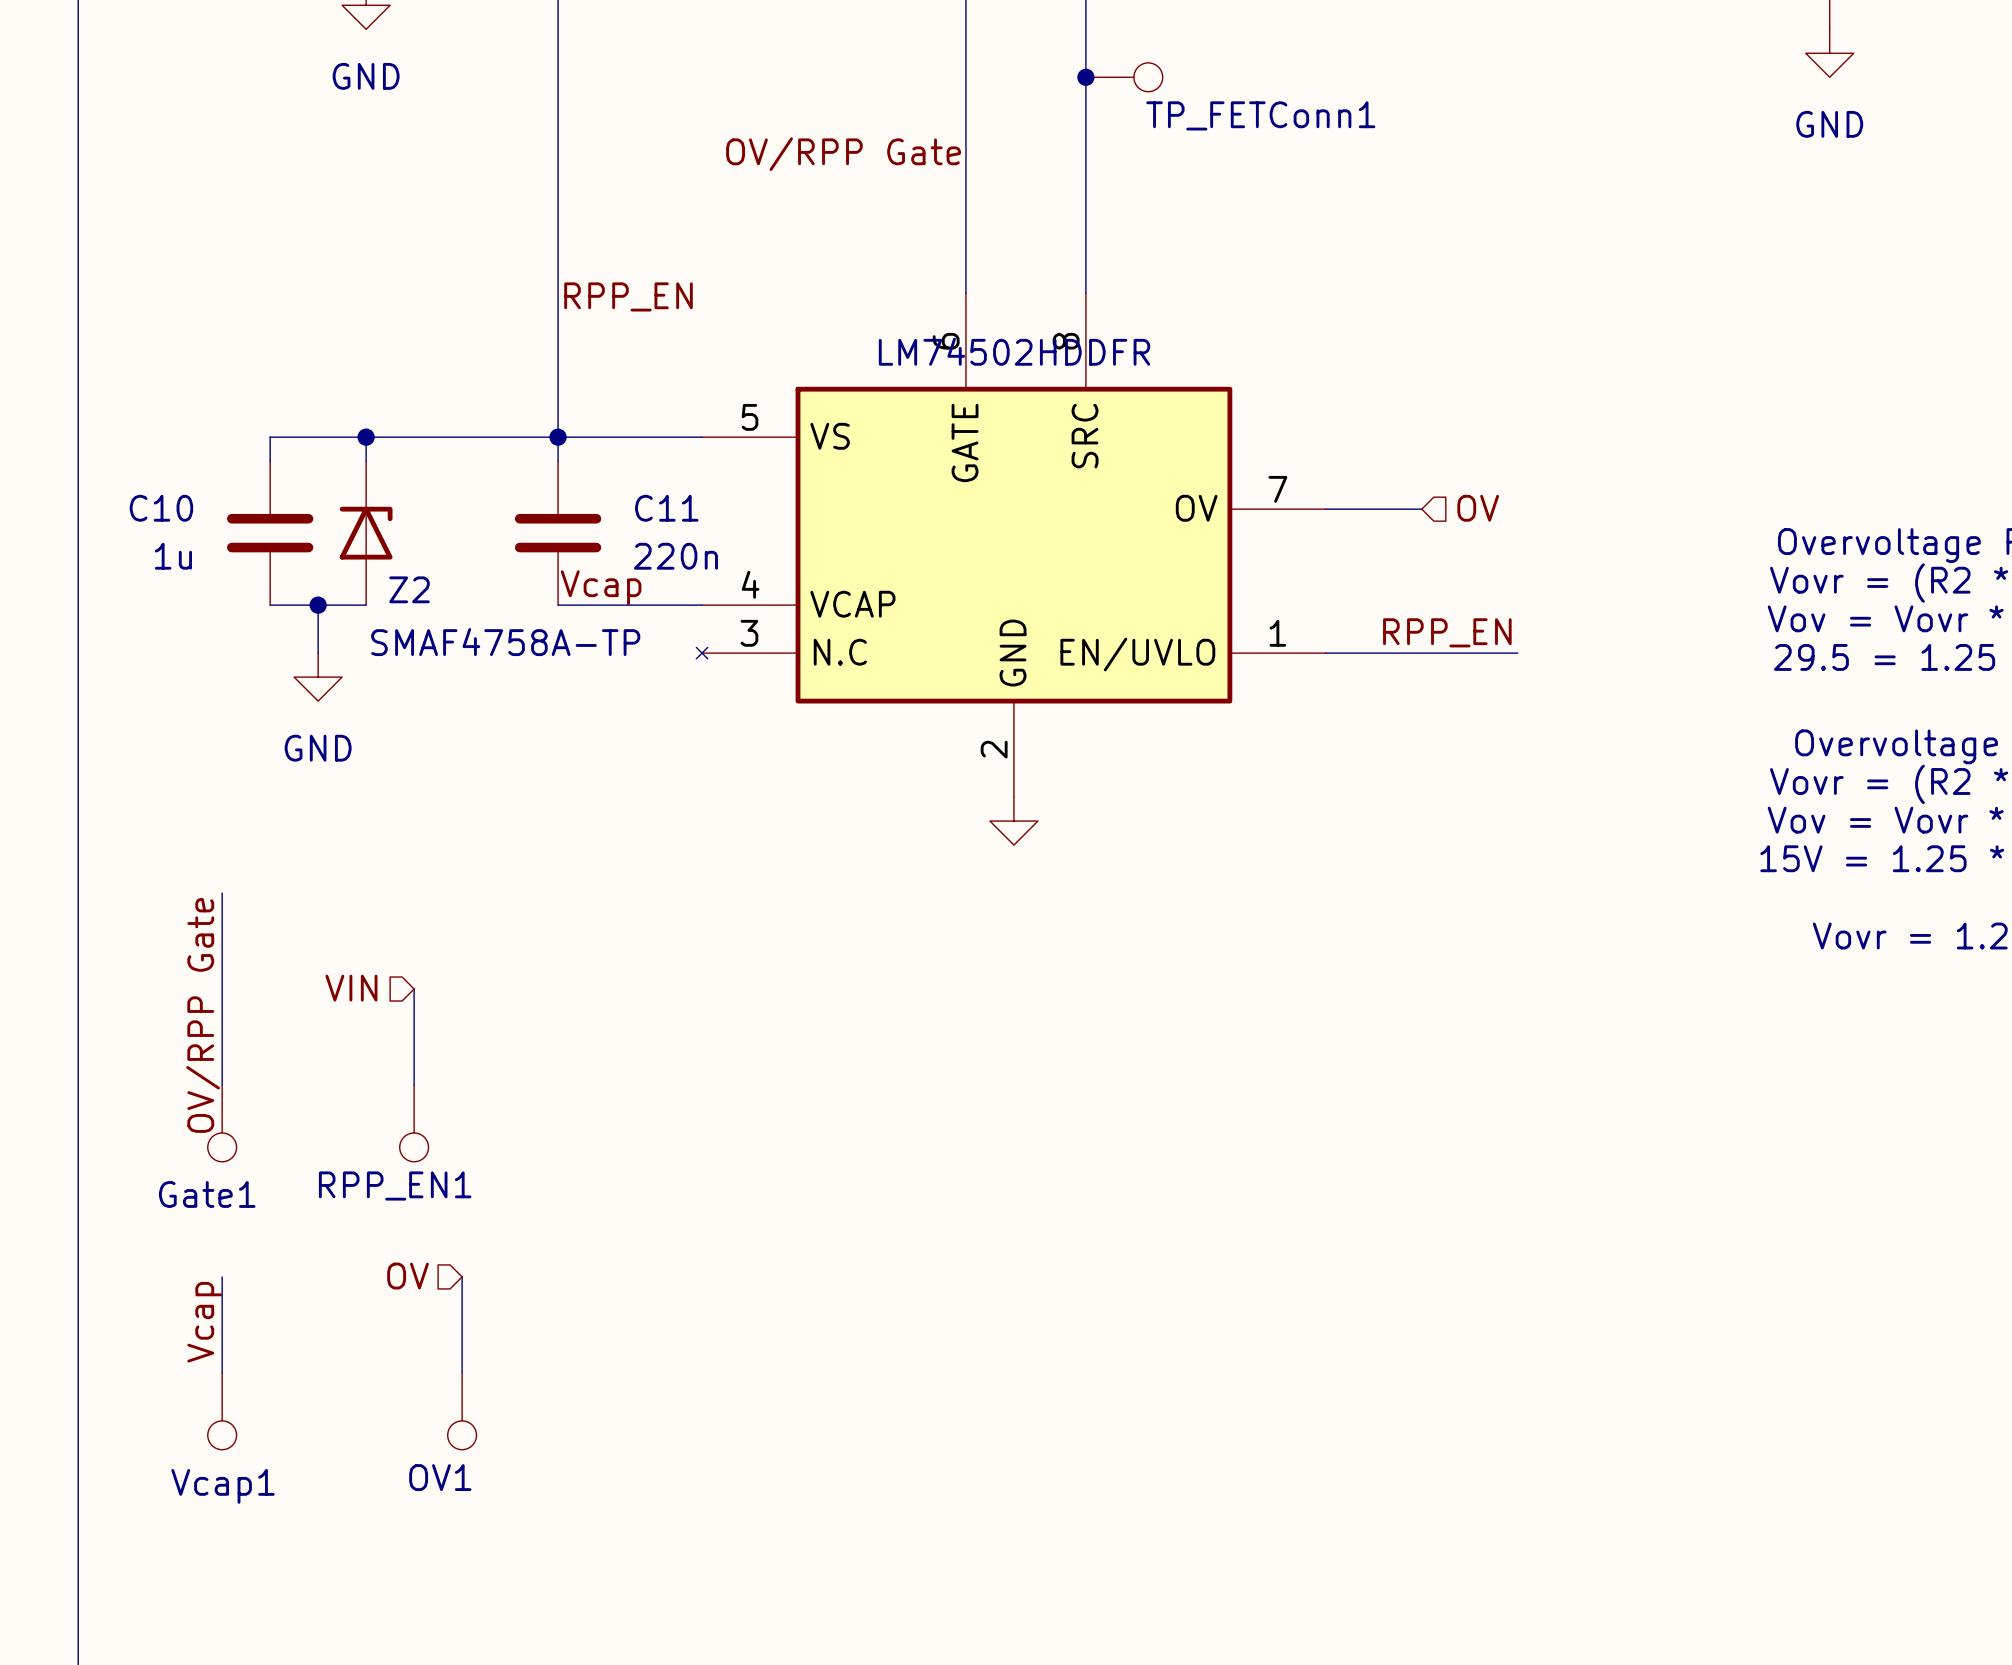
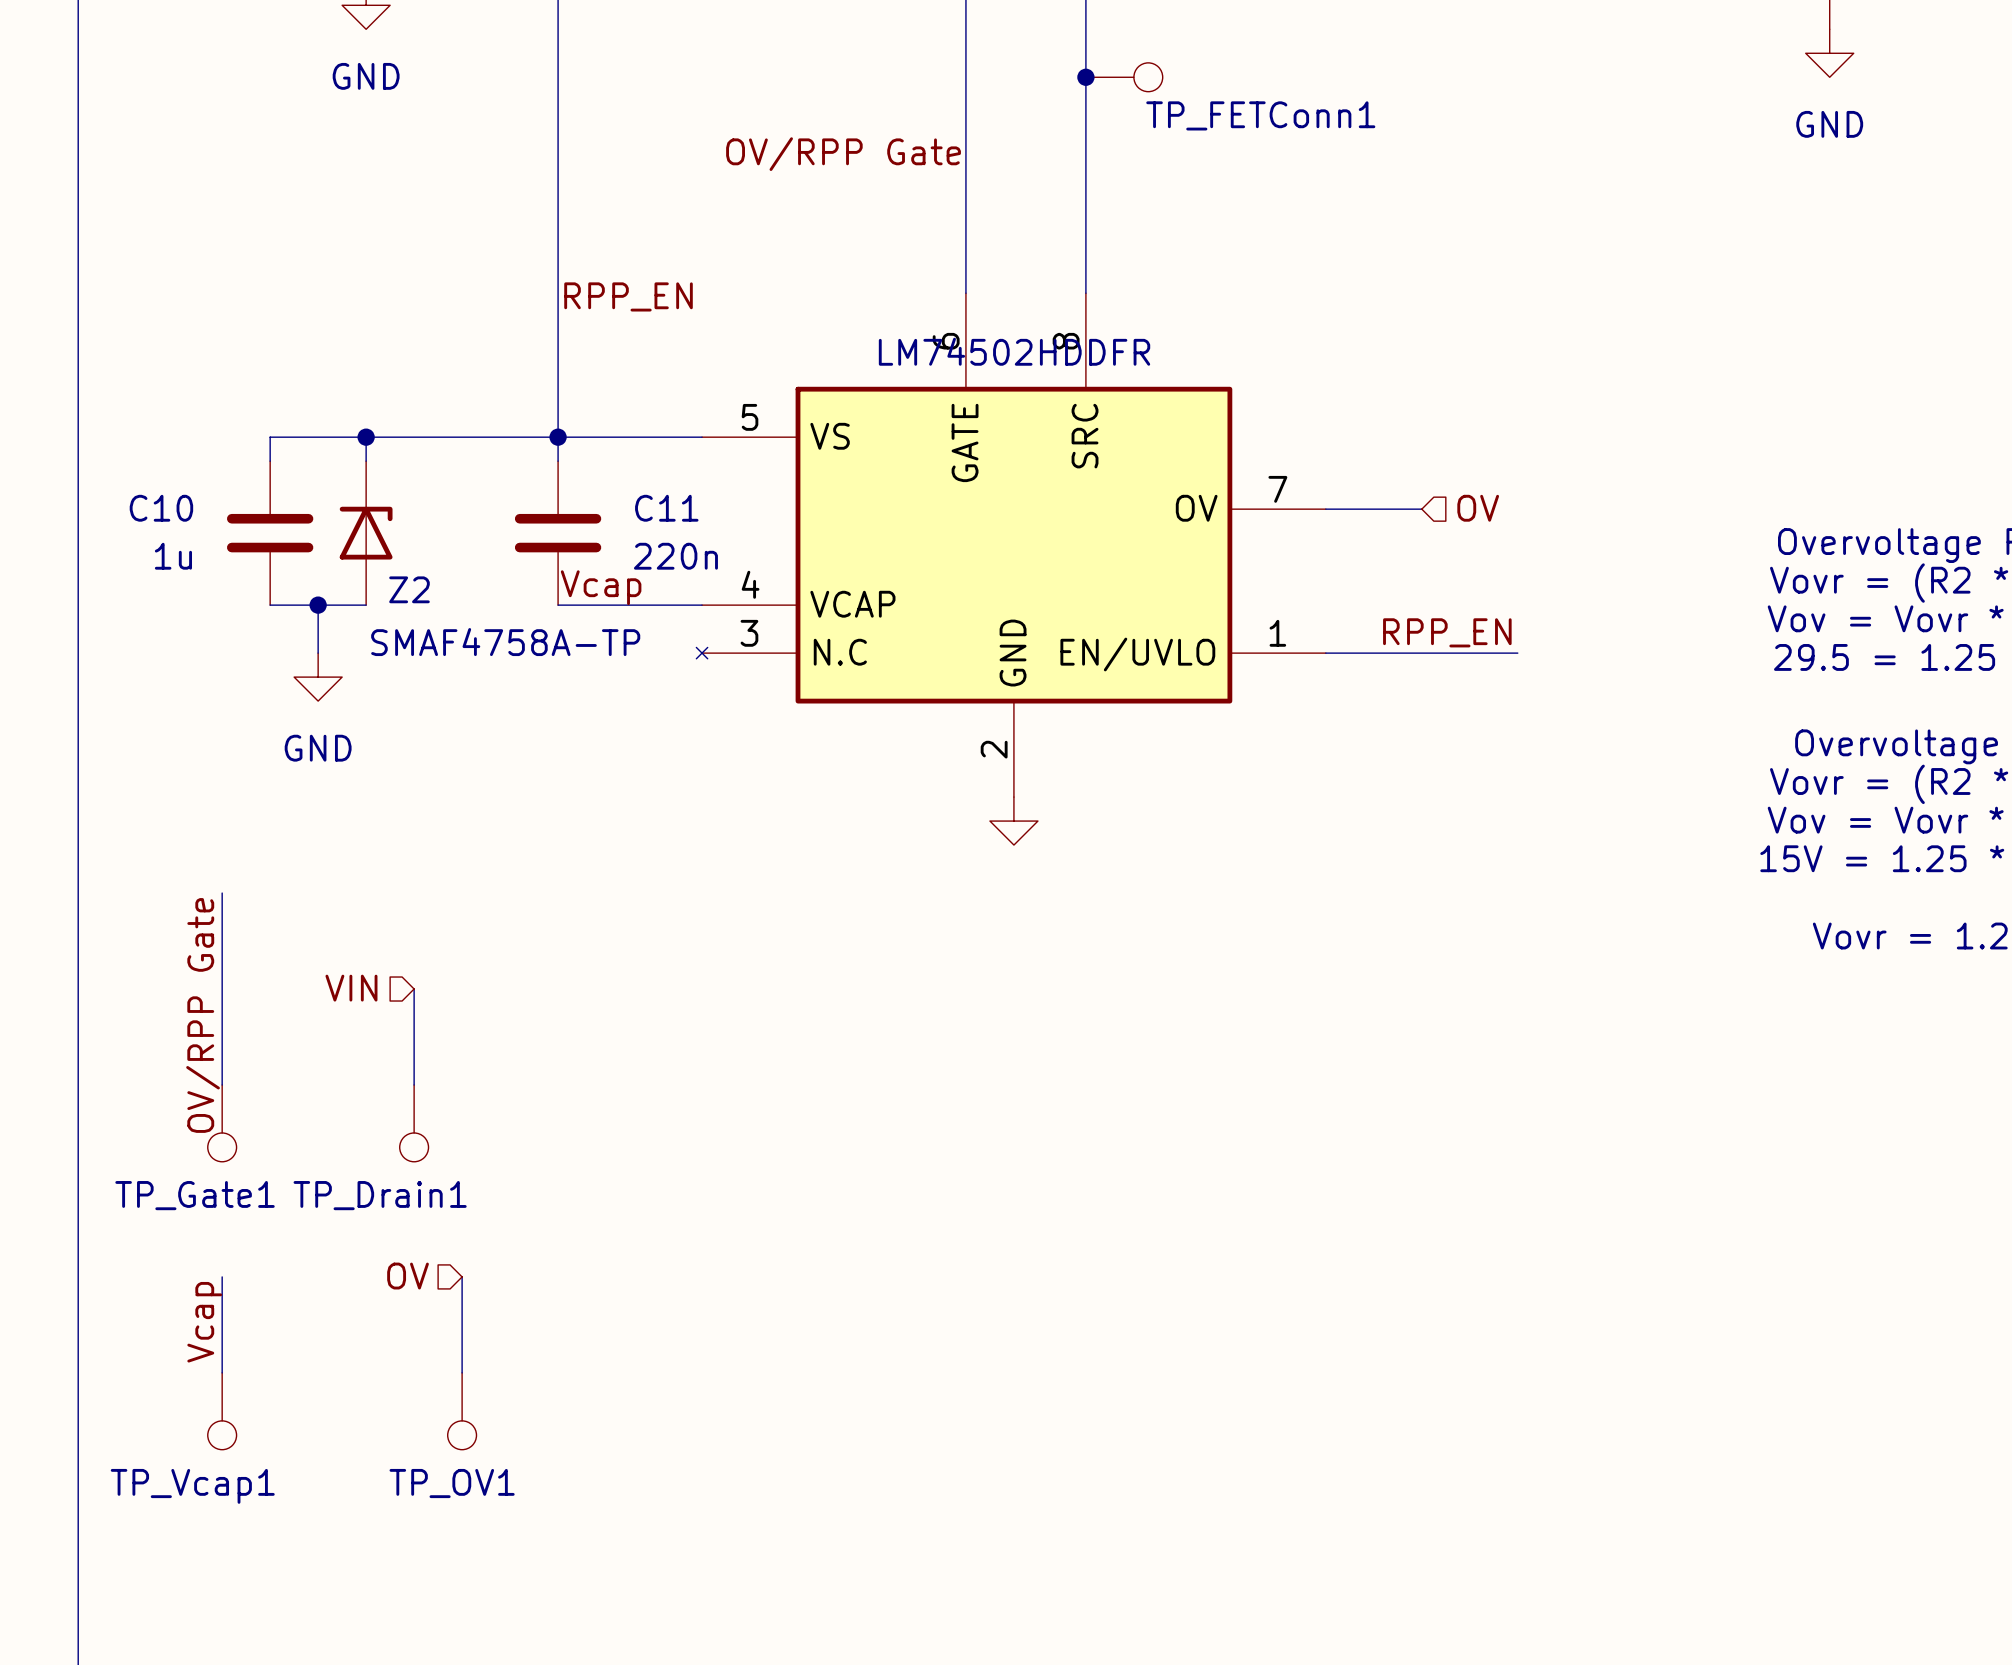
RPP_EN1 name: RPP_EN1 (395, 1186) -> TP_Drain1 (380, 1195)
Gate1 name: Gate1 (207, 1194) -> TP_Gate1 (195, 1195)
OV1 name: OV1 (440, 1477) -> TP_OV1 (452, 1483)
Vcap1 name: Vcap1 (223, 1486) -> TP_Vcap1 (192, 1486)

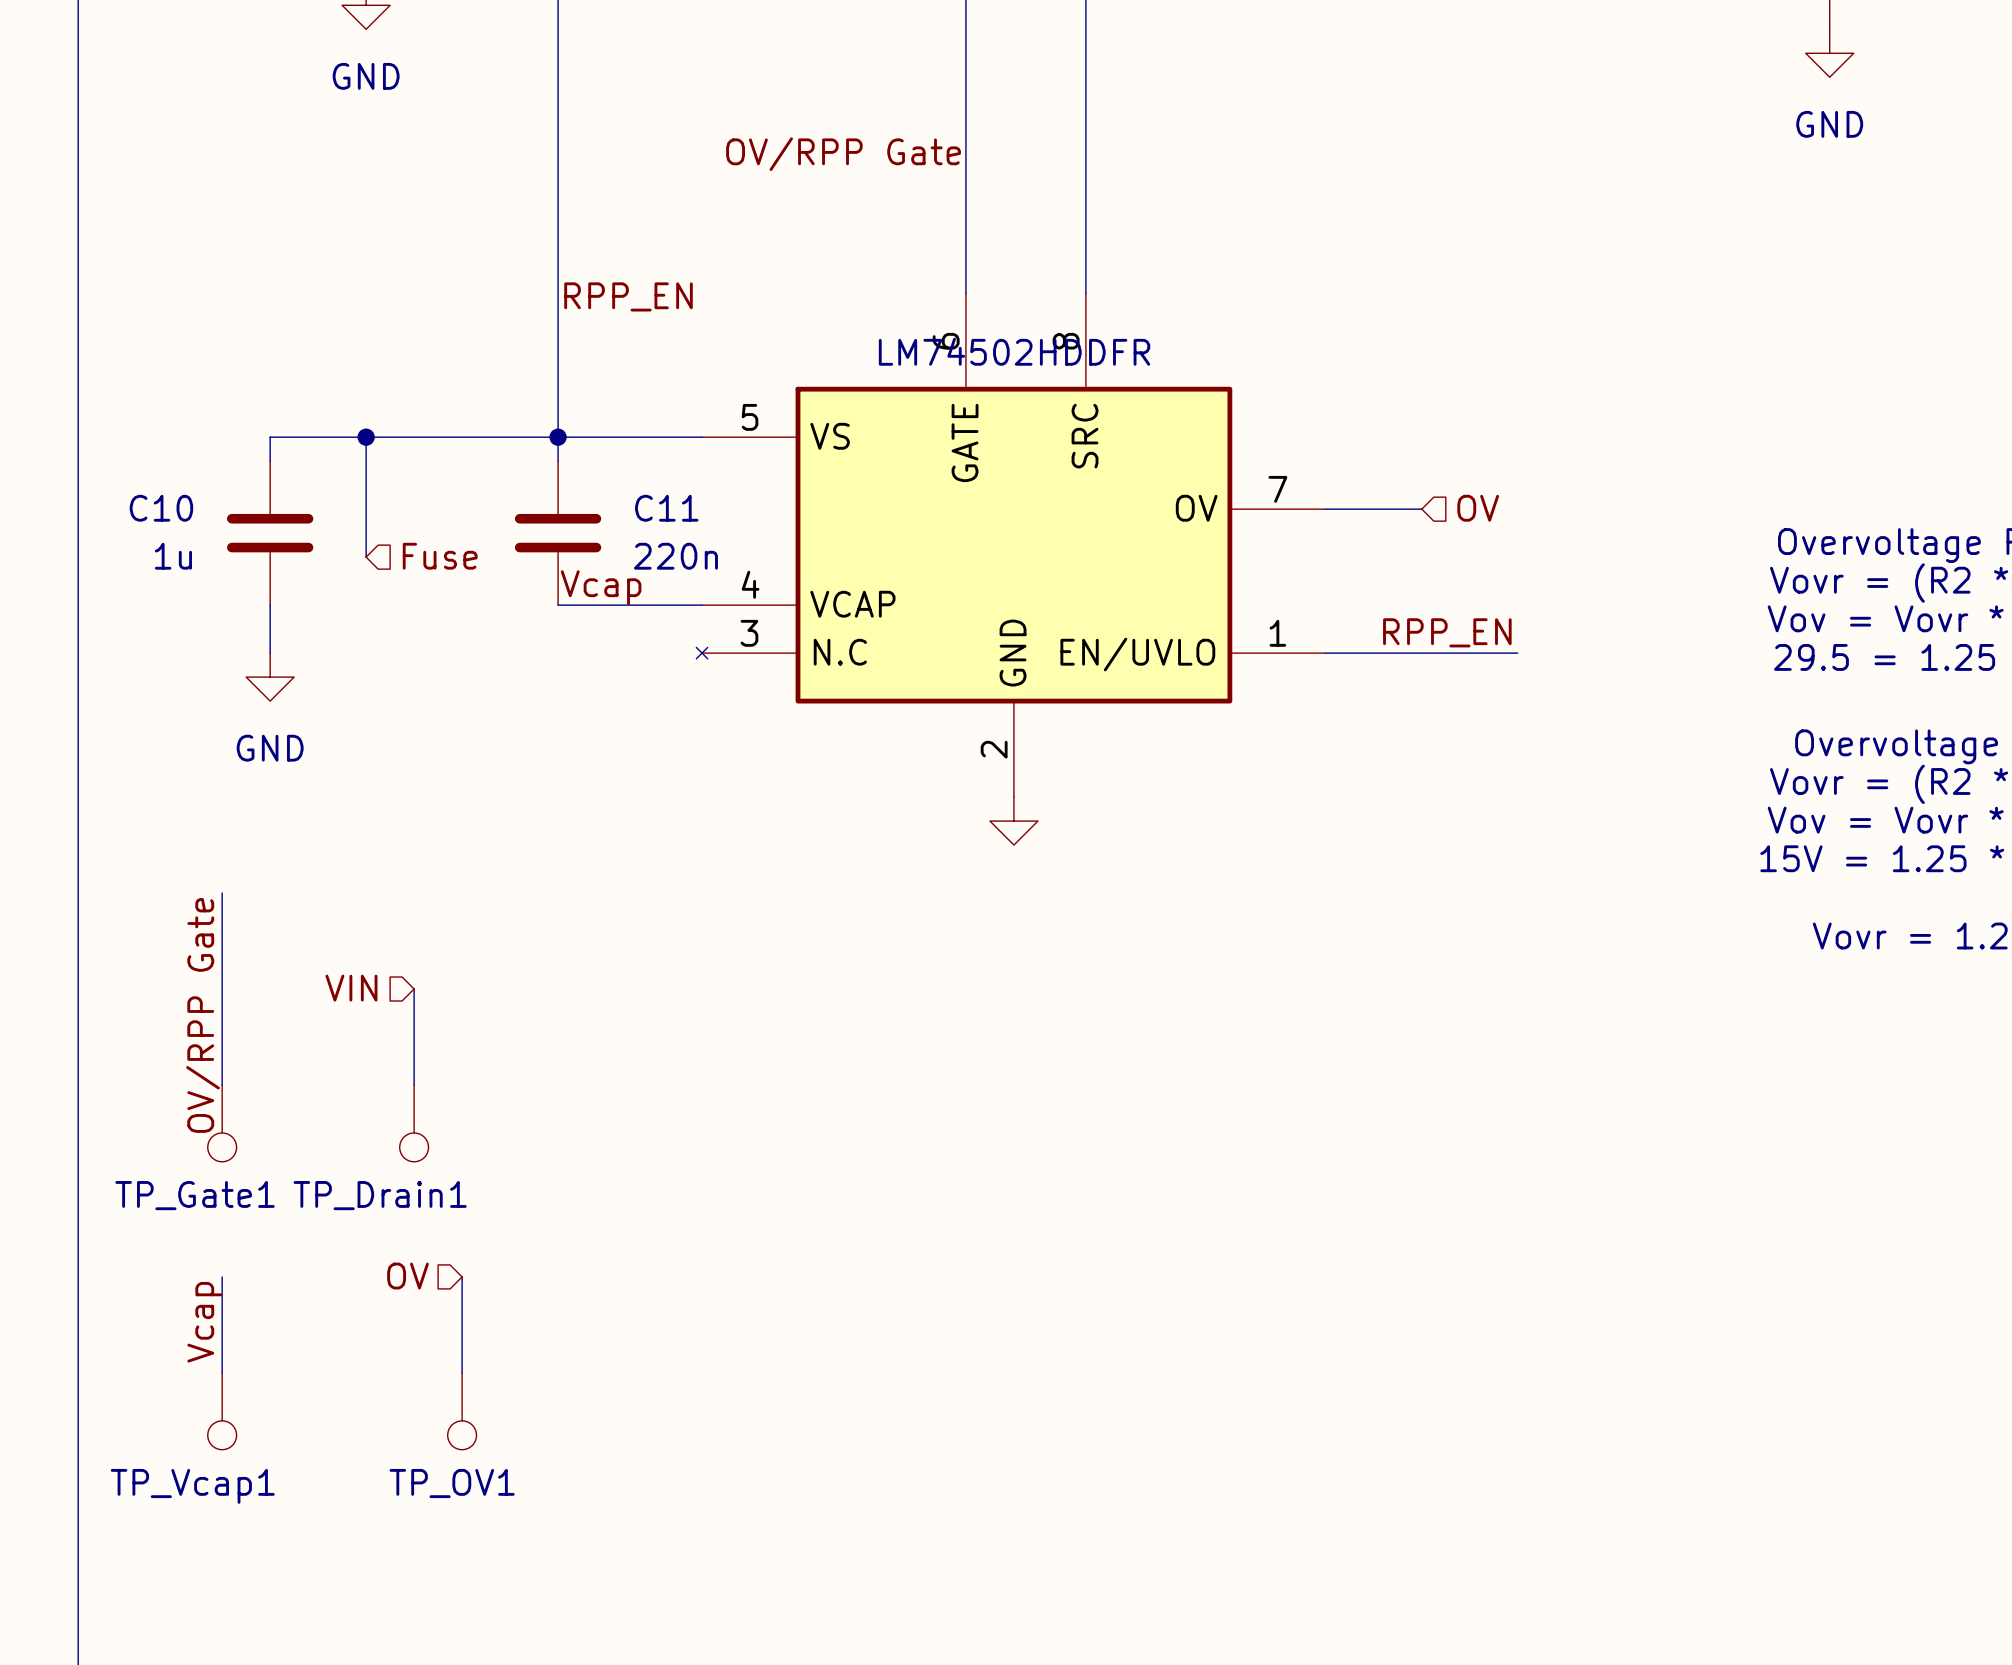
junction: (1085, 77) -> none
TP_FETConn1: (1124, 77) -> none
Z2: SMAF4758A-TP (366, 533) -> none
hierarchical label: none -> Fuse (440, 556)
wire: (270, 605) (366, 605) -> (270, 605) (270, 653)
wire: (318, 605) (318, 653) -> none
junction: (318, 605) -> none
power symbol position: GND (318, 677) -> GND (270, 677)

